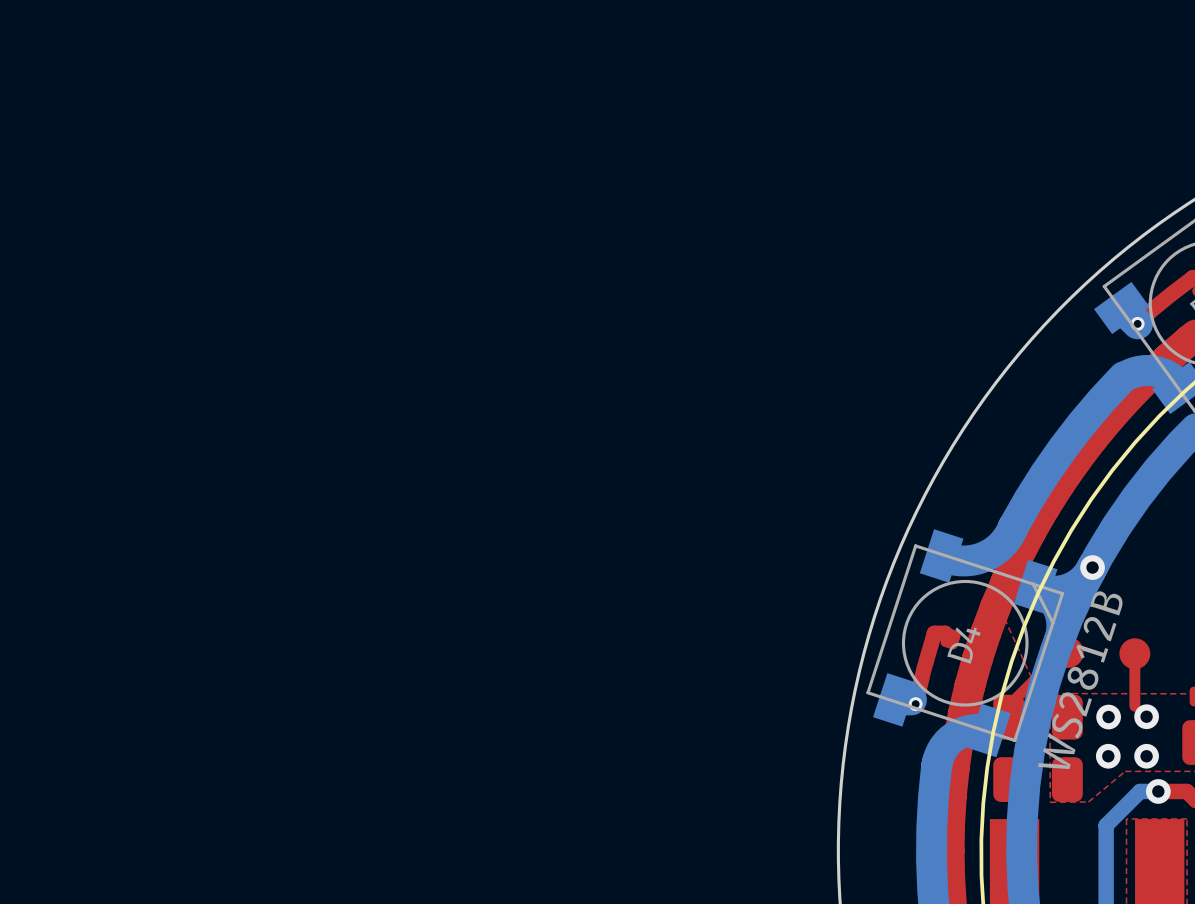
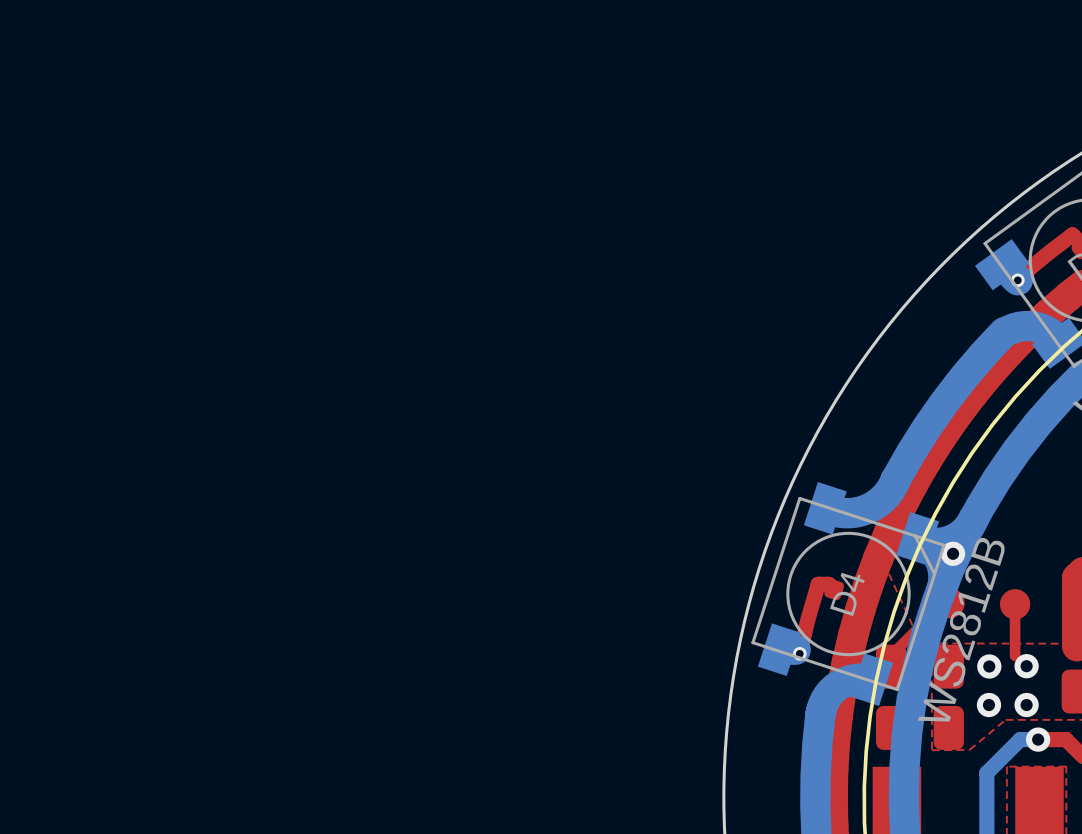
via position: (1092, 567) -> (953, 553)

